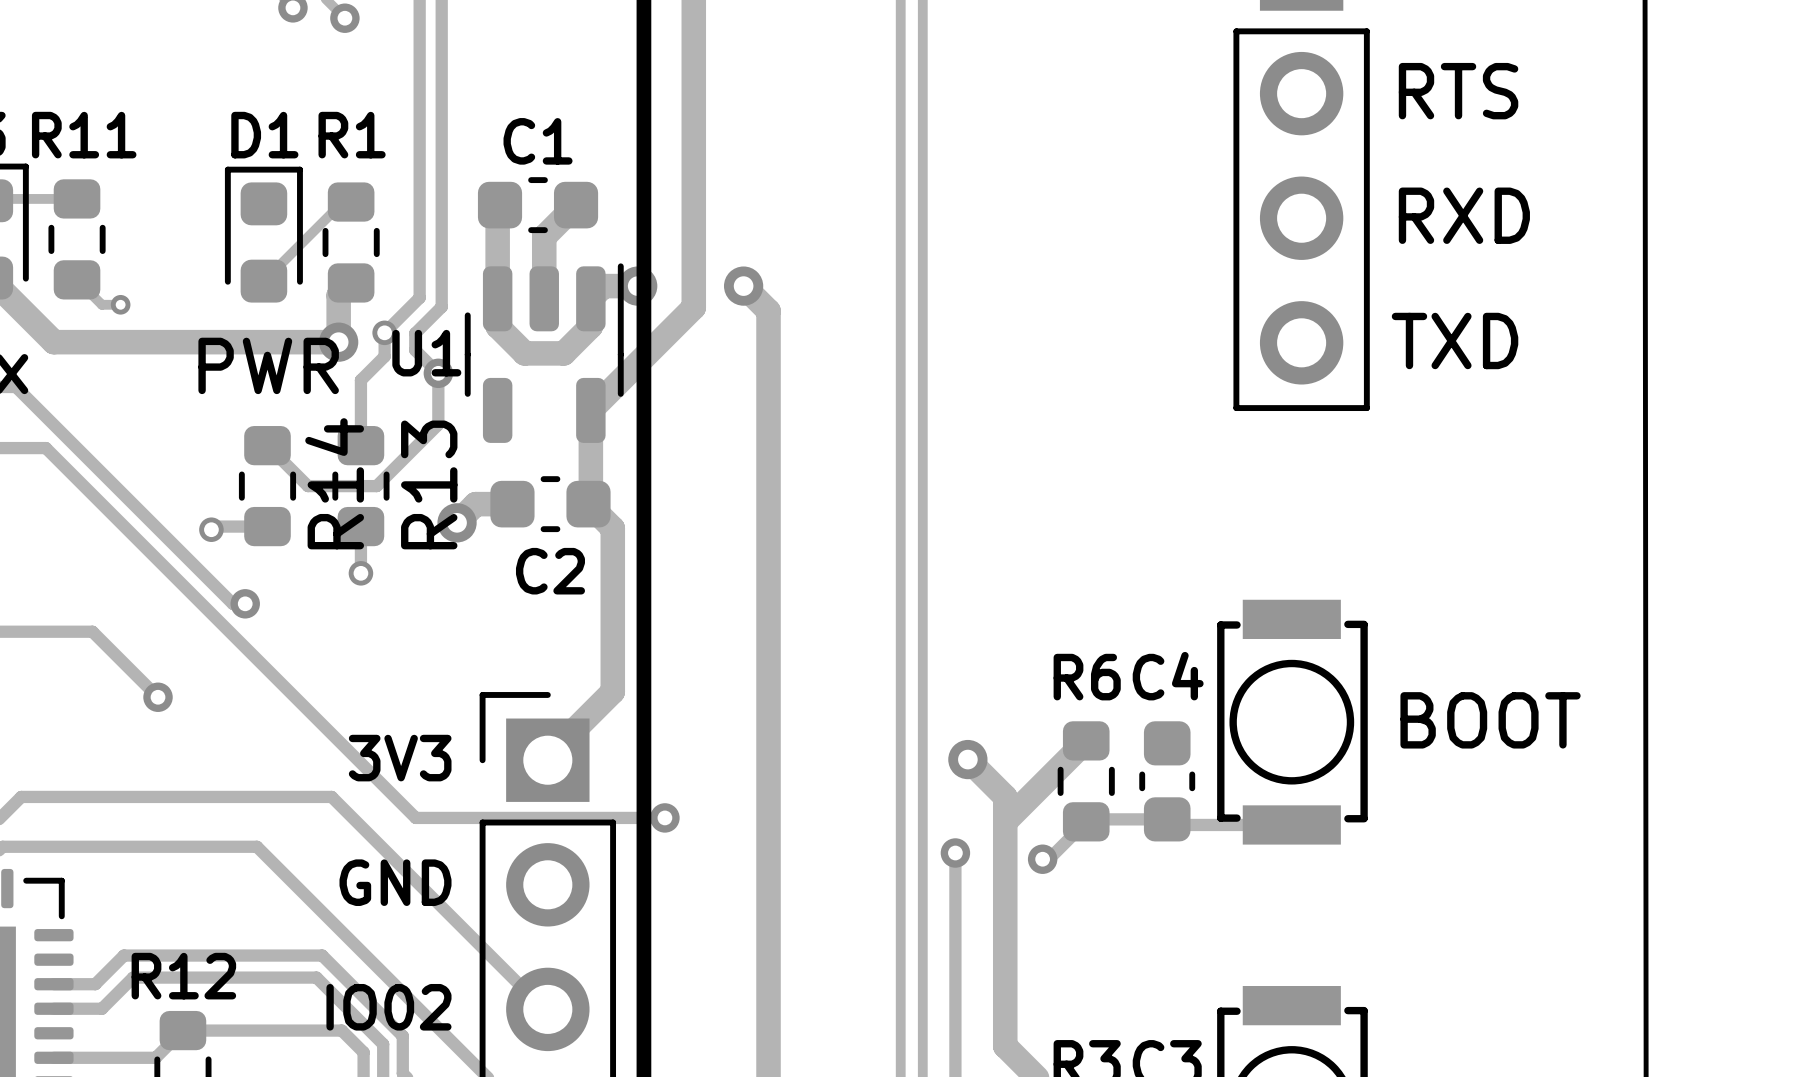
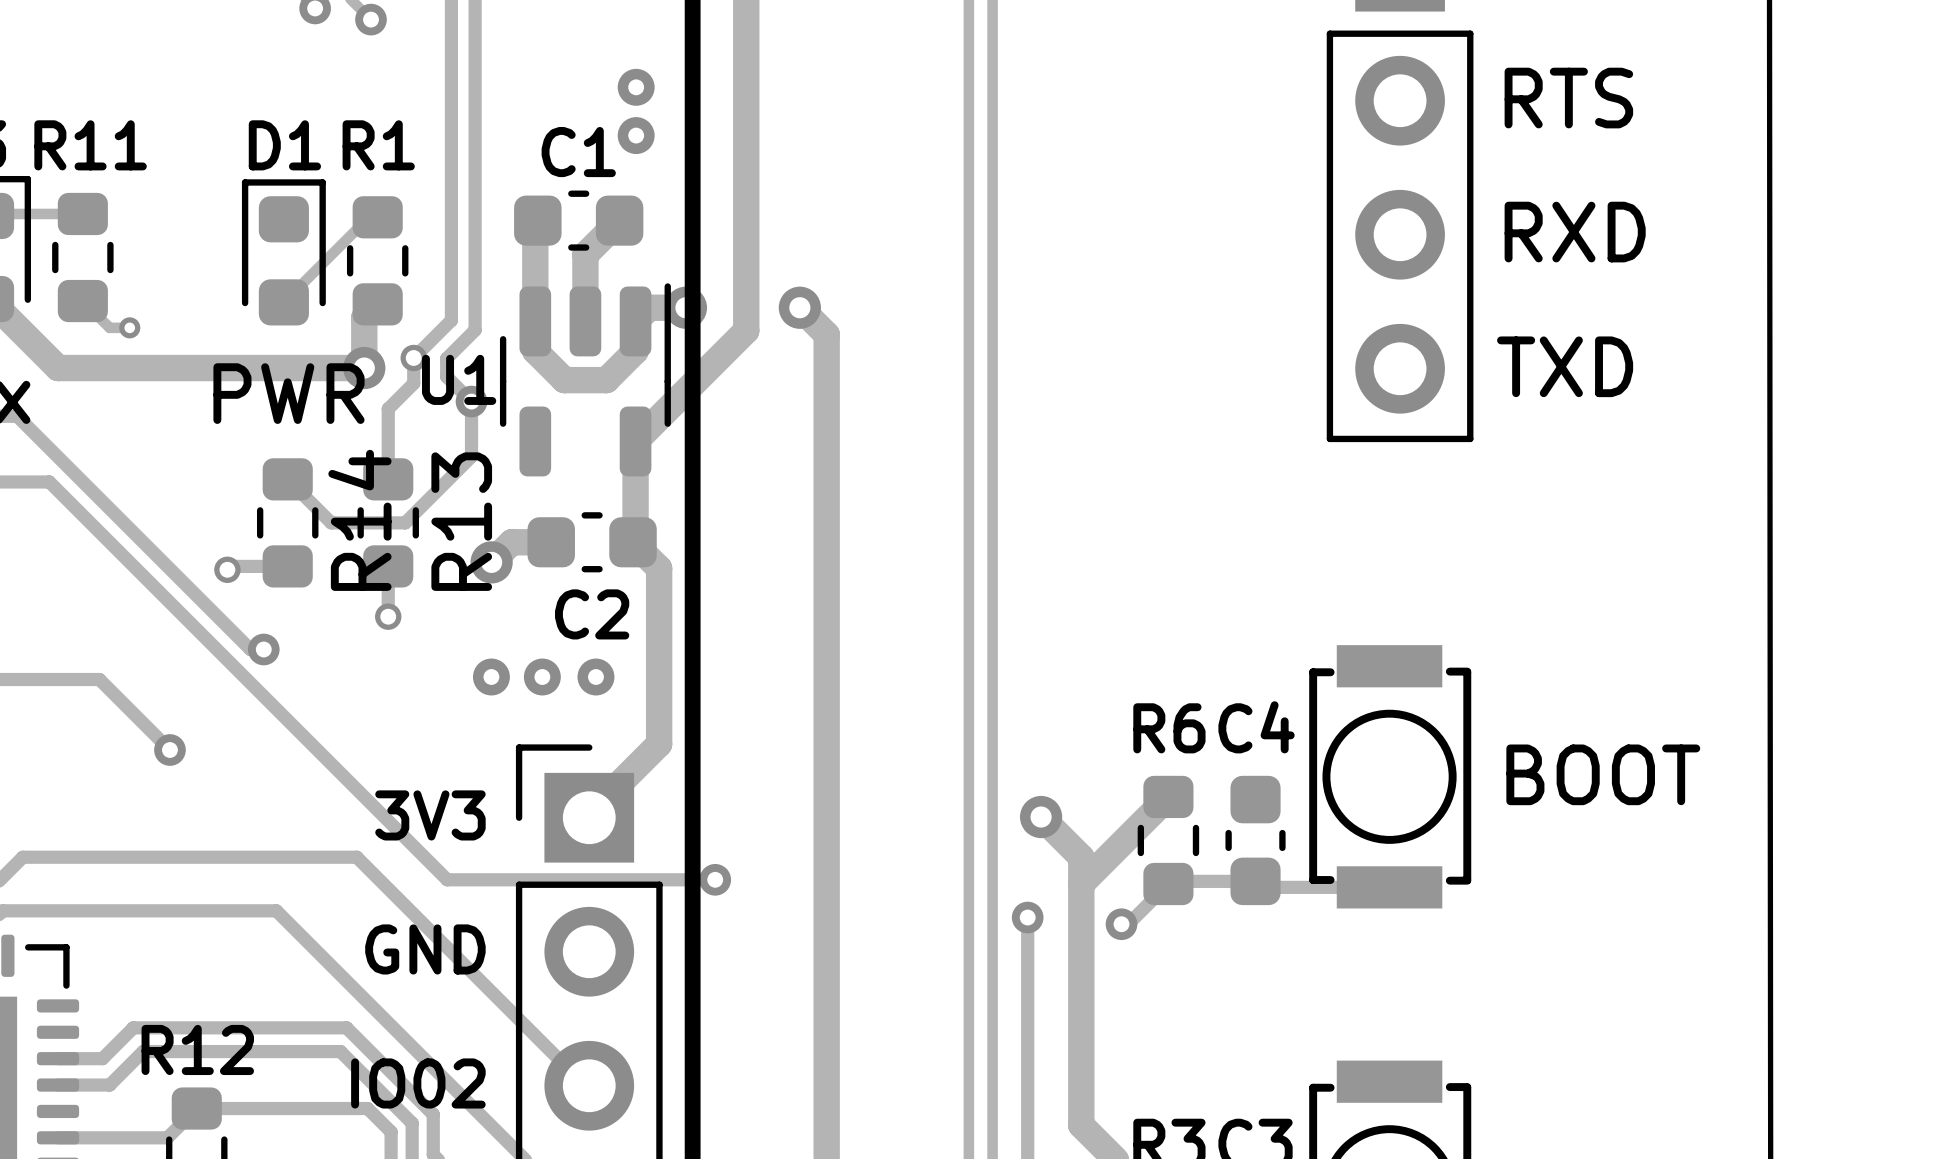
via: none -> (636, 87)
via: none -> (636, 135)
via: none -> (491, 677)
via: none -> (542, 677)
via: none -> (595, 677)

